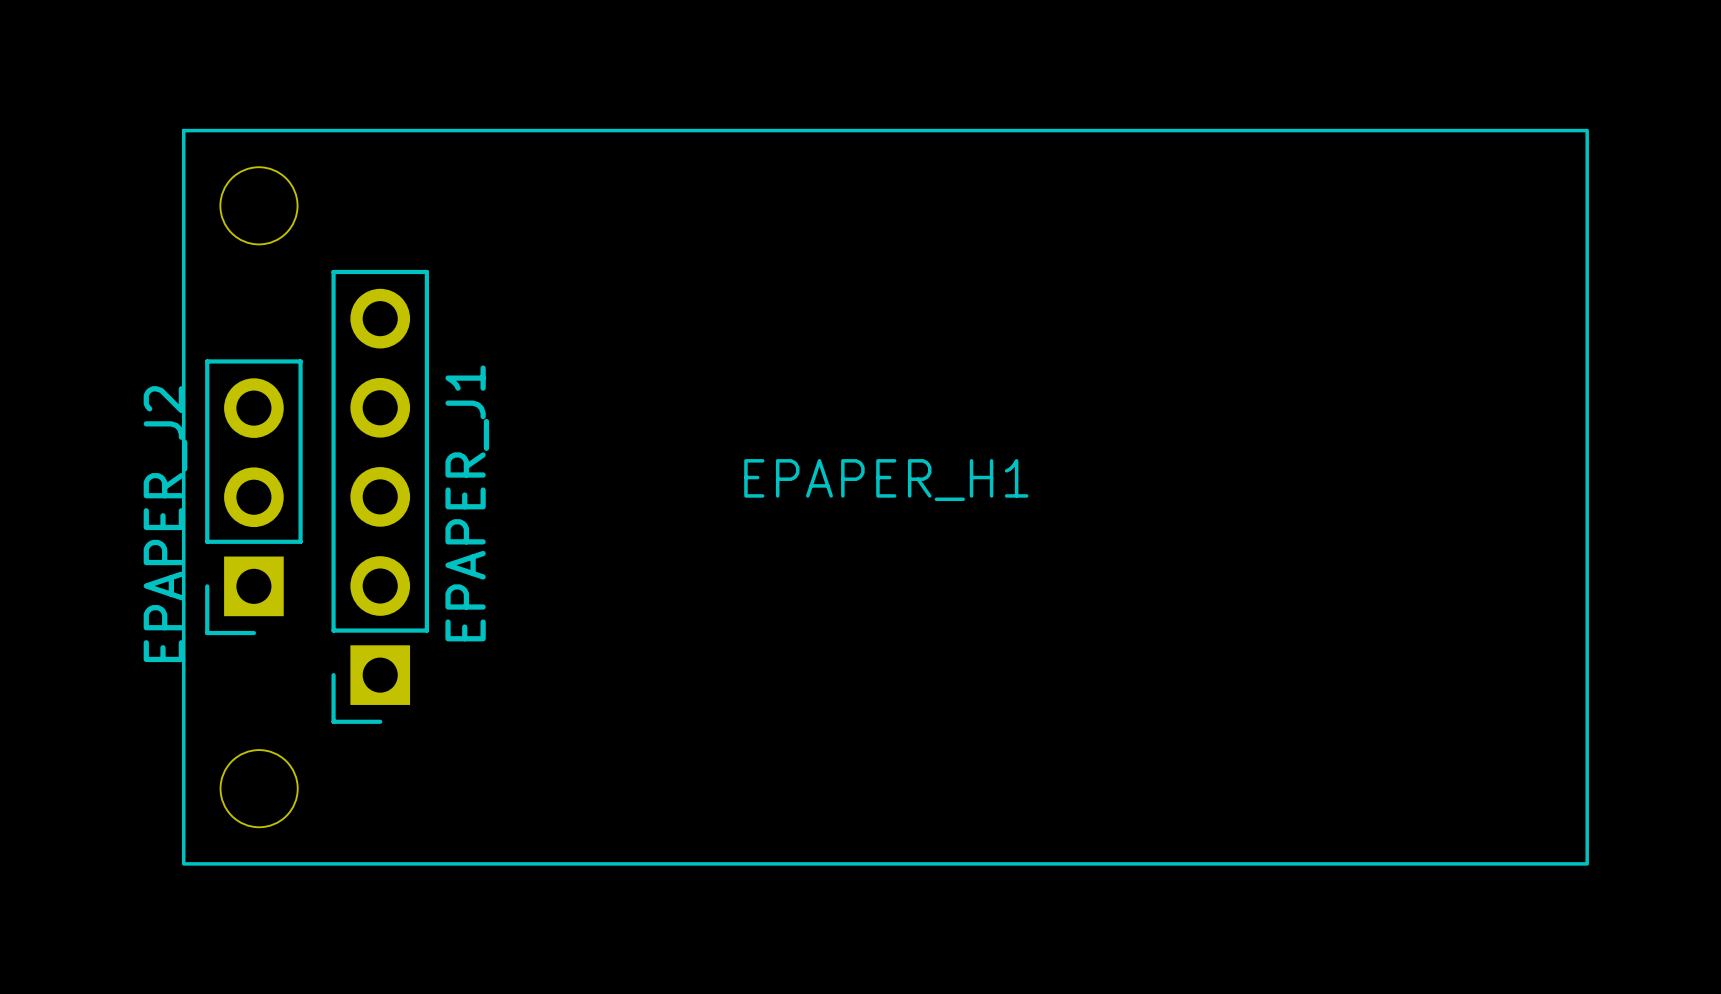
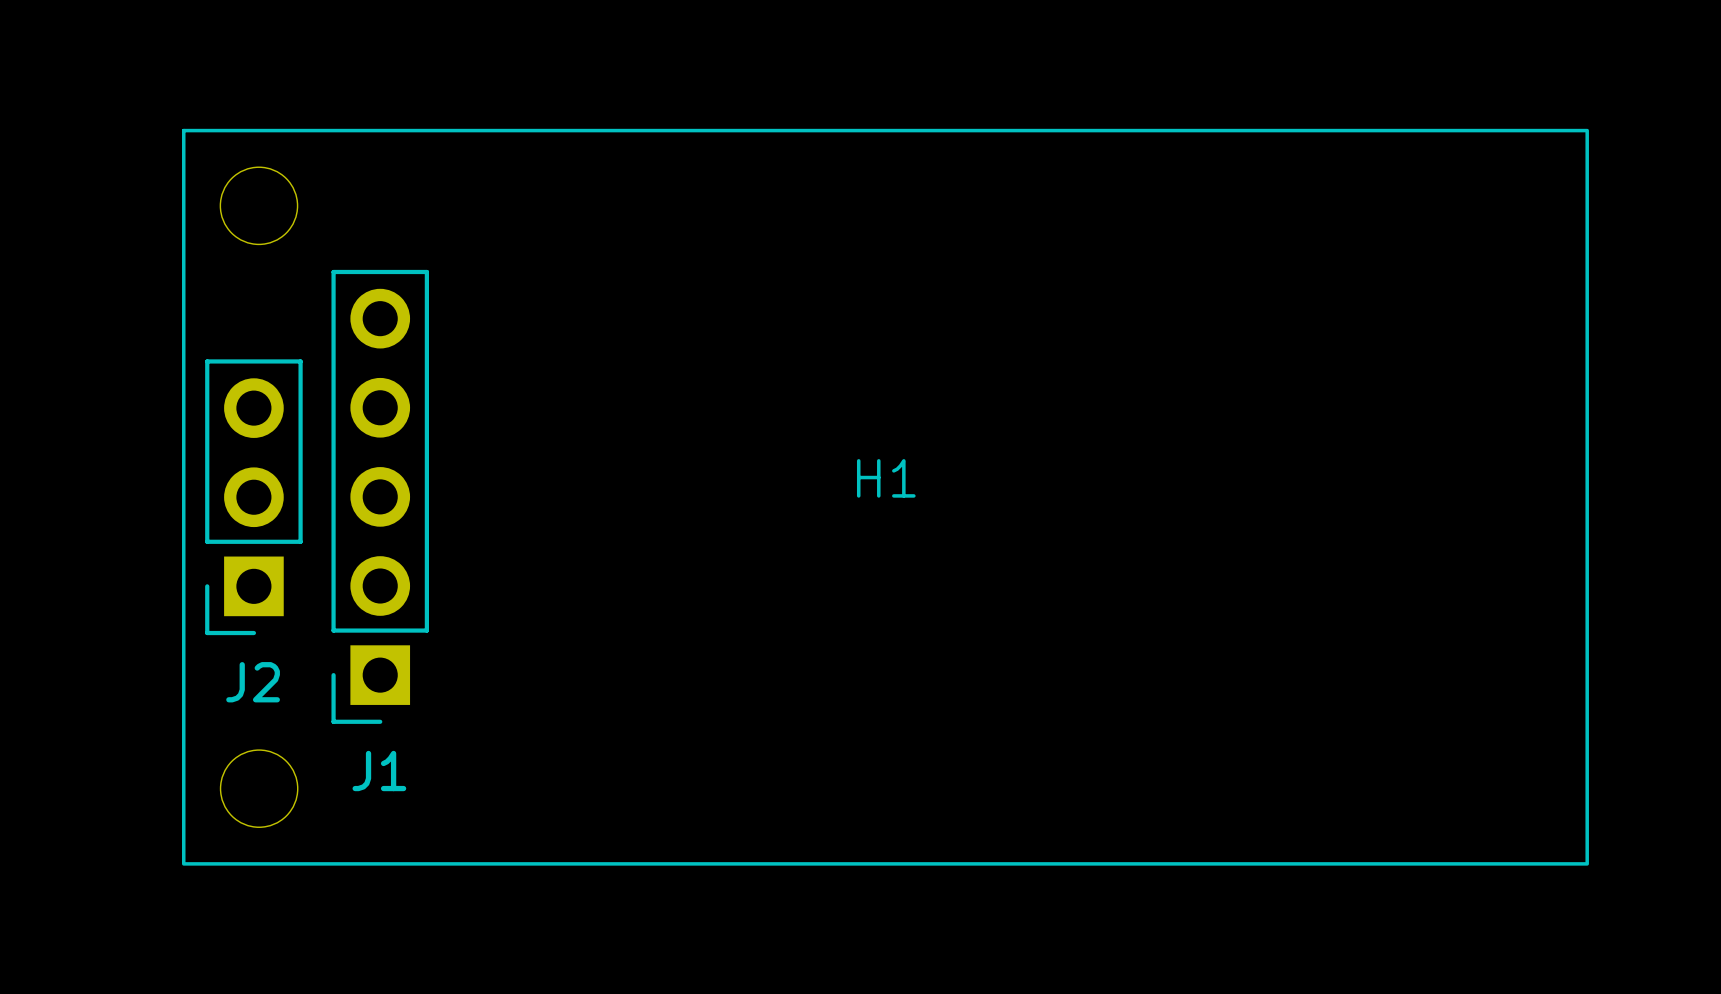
EPAPER_H1 name: EPAPER_H1 (886, 480) -> H1 (886, 478)
EPAPER_J1 name: EPAPER_J1 (467, 503) -> J1 (379, 771)
EPAPER_J2 name: EPAPER_J2 (165, 524) -> J2 (253, 682)

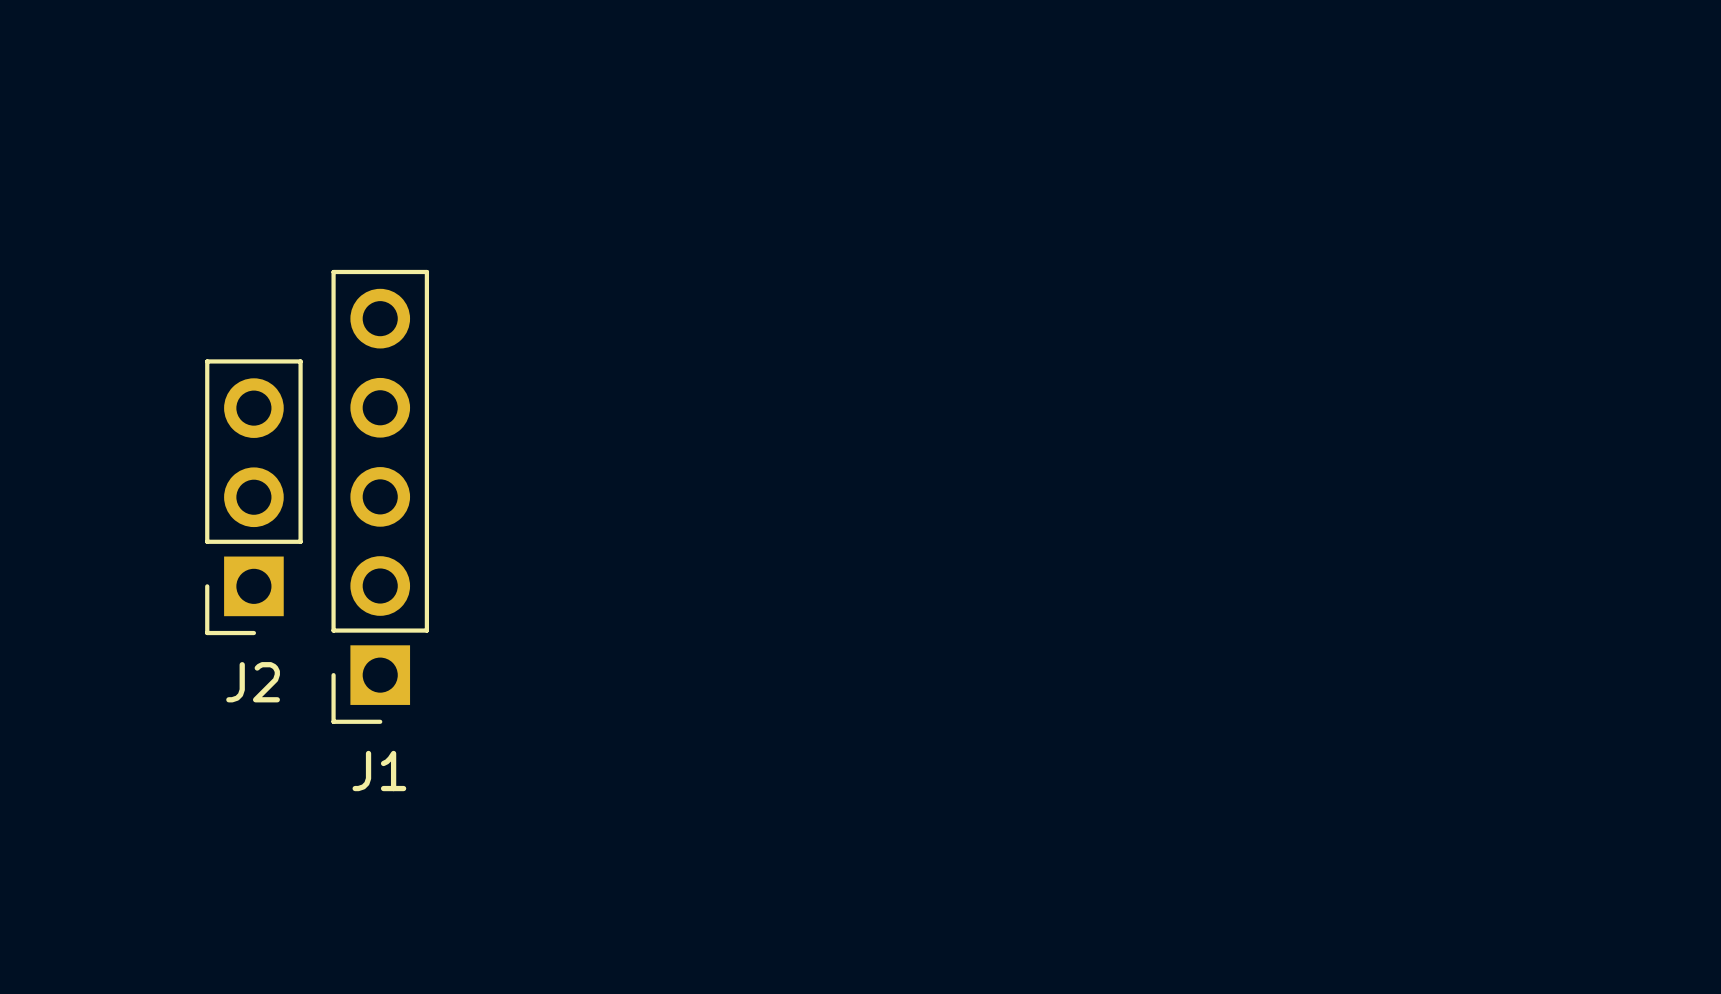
H1: (885, 497) -> none

